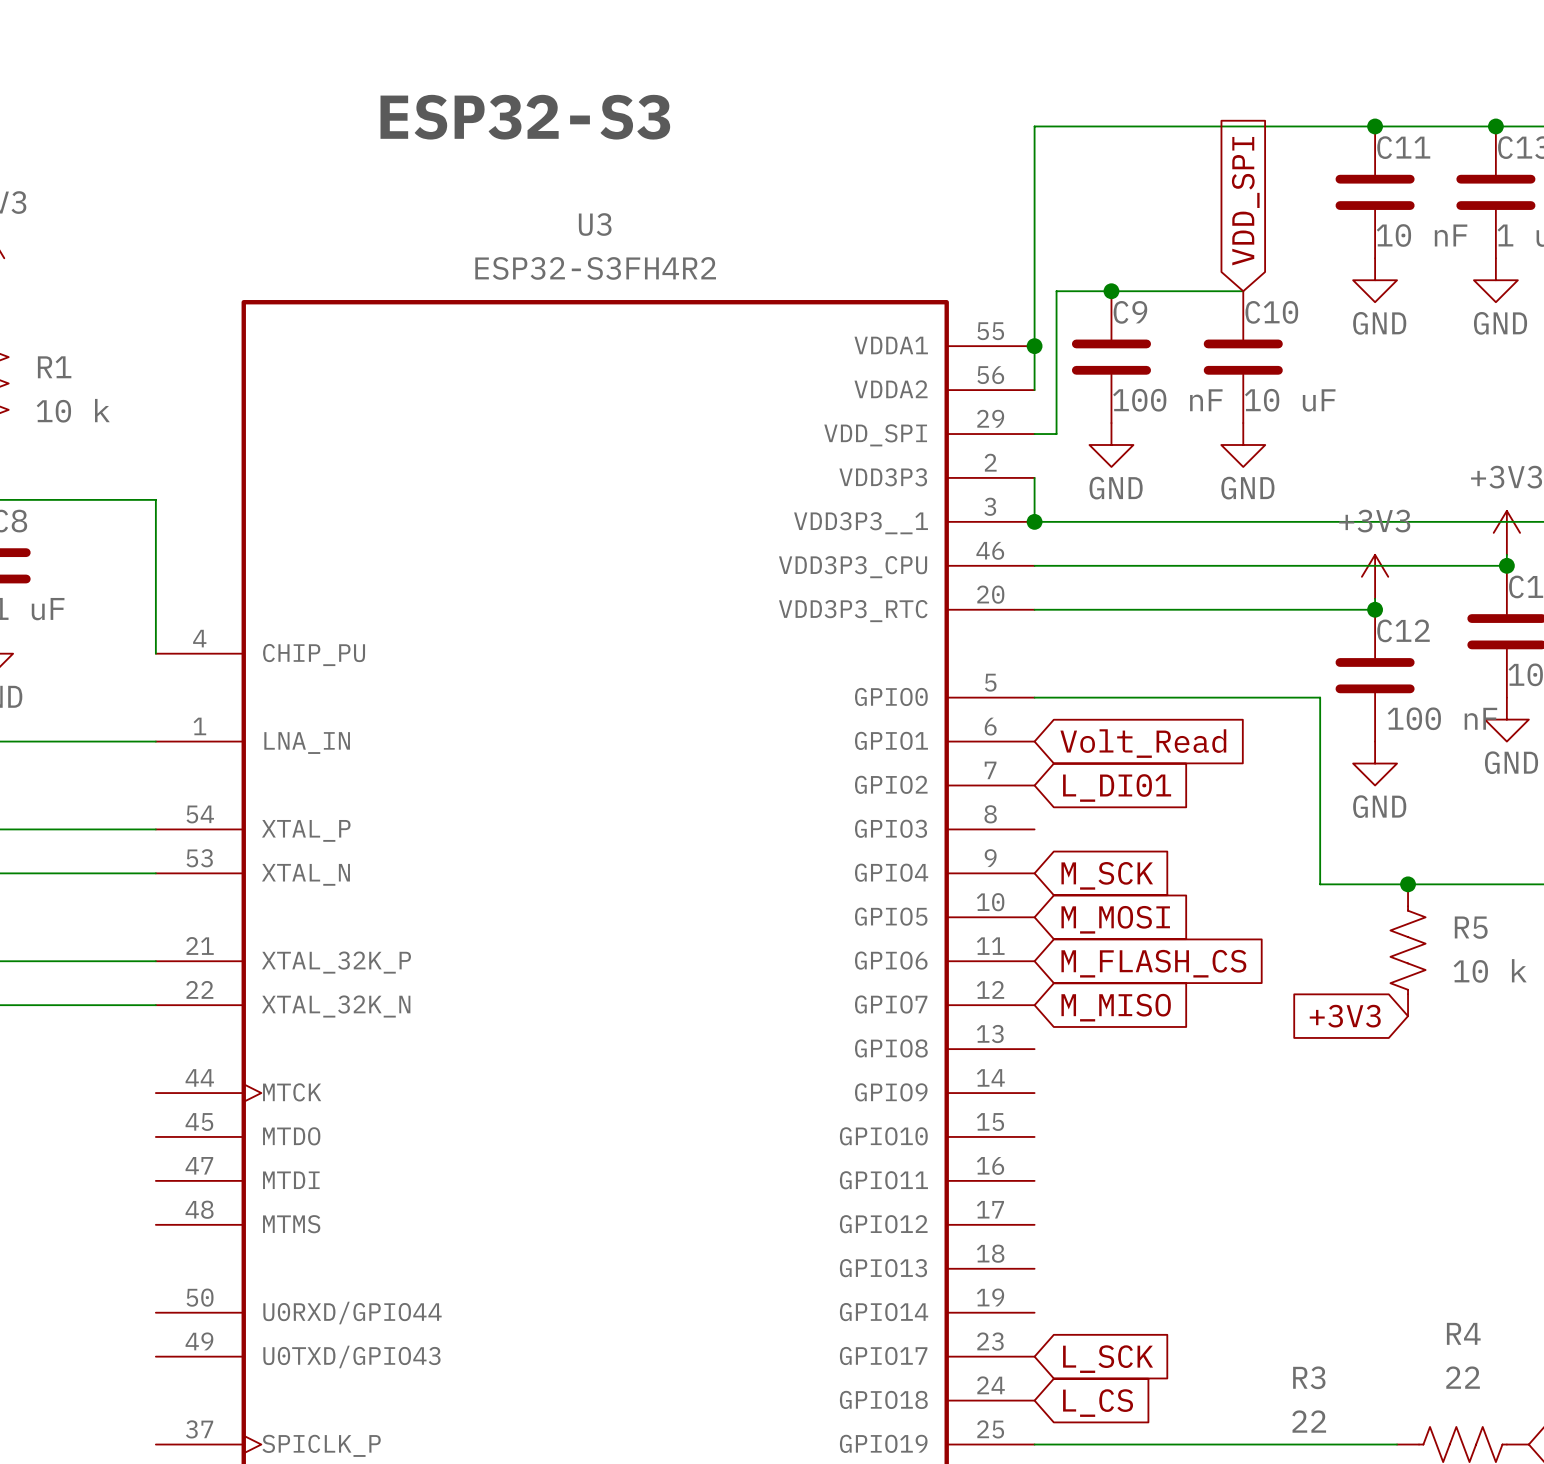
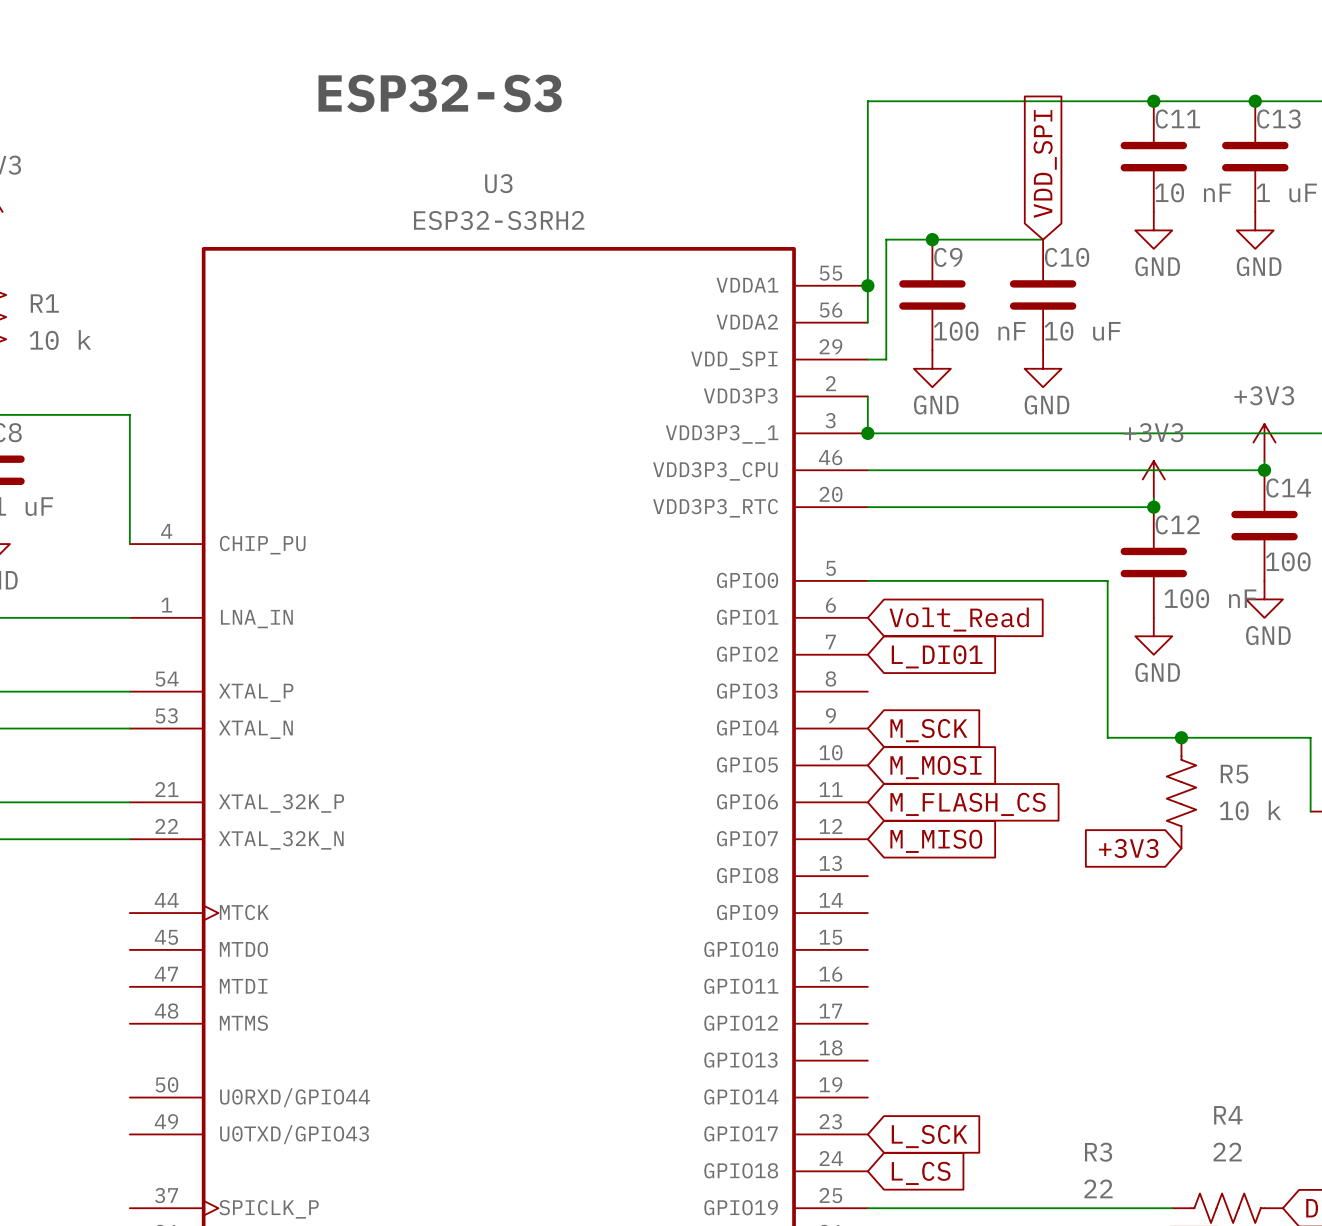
U3 value: ESP32-S3FH4R2 (595, 268) -> ESP32-S3RH2 (499, 220)

